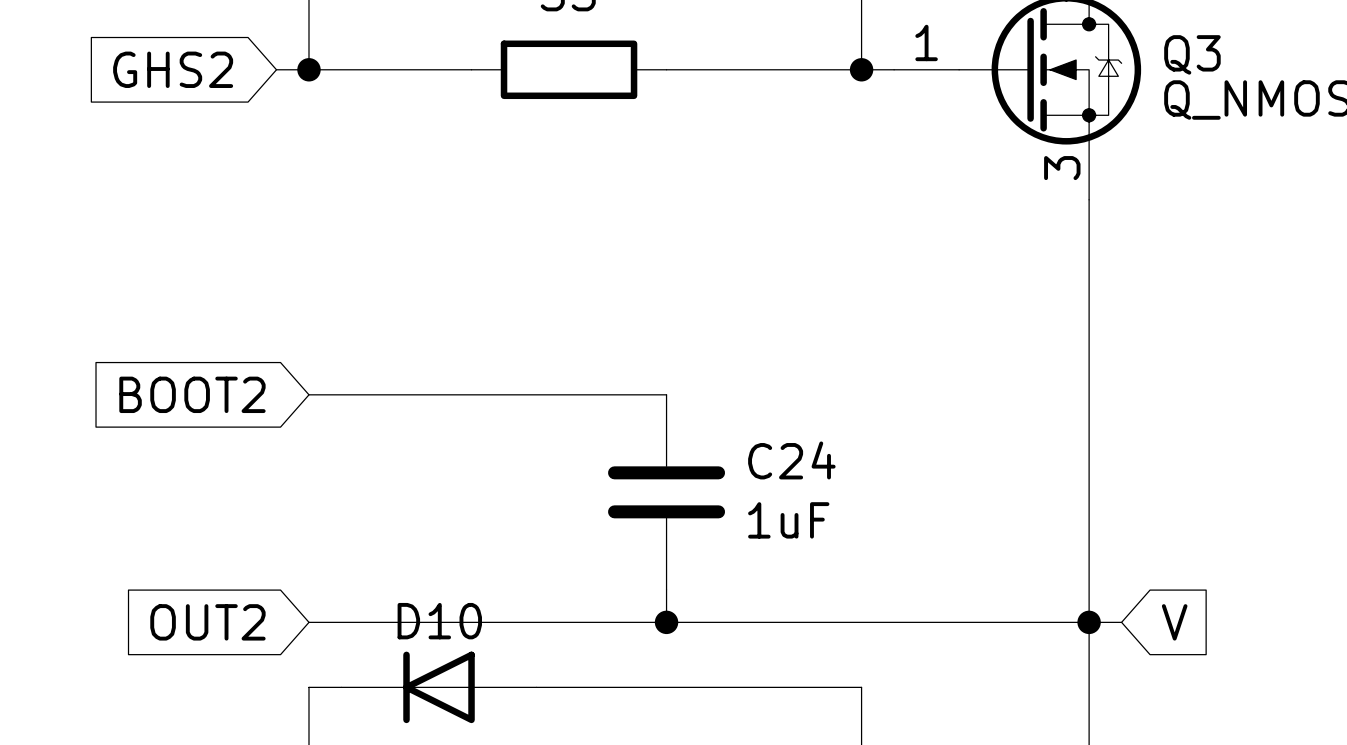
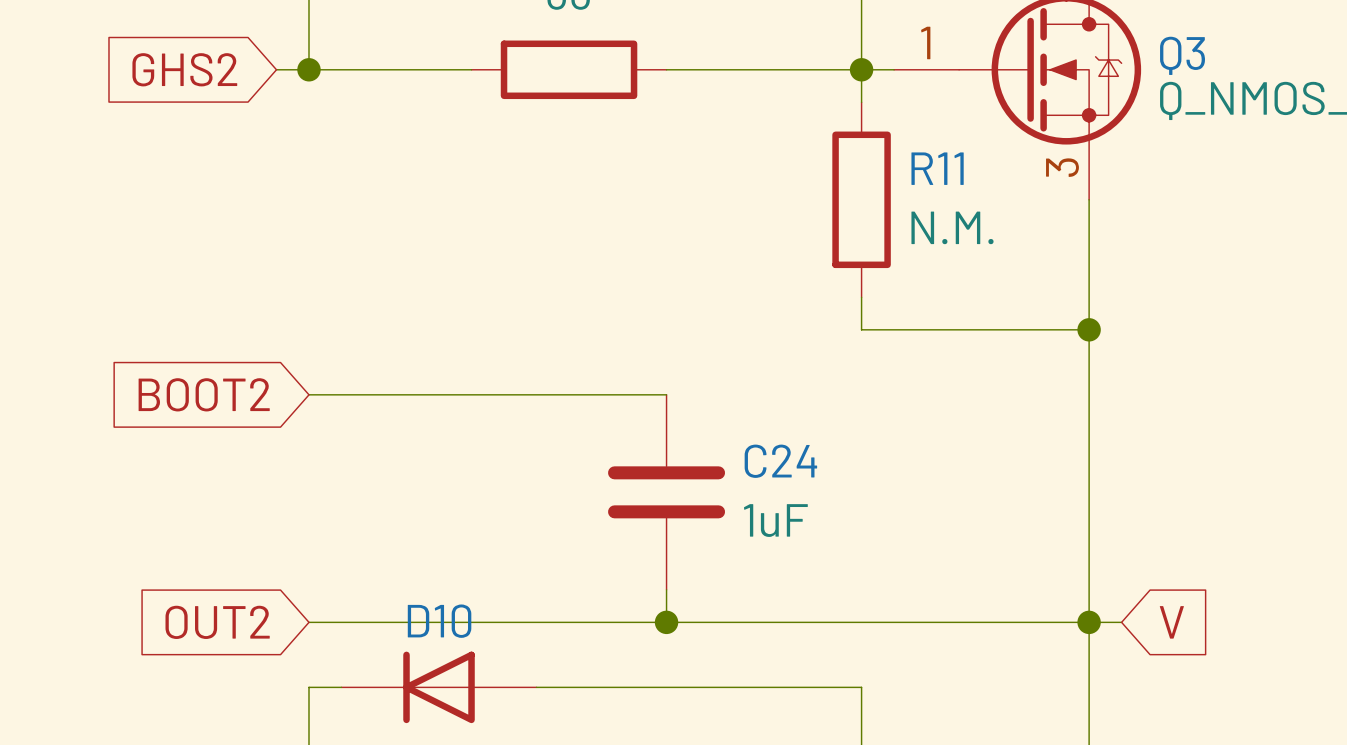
wire: none -> (861, 69) (861, 102)
R11: none -> N.M. (861, 199)
wire: none -> (861, 297) (861, 329) (1089, 329)
junction: none -> (1089, 329)

